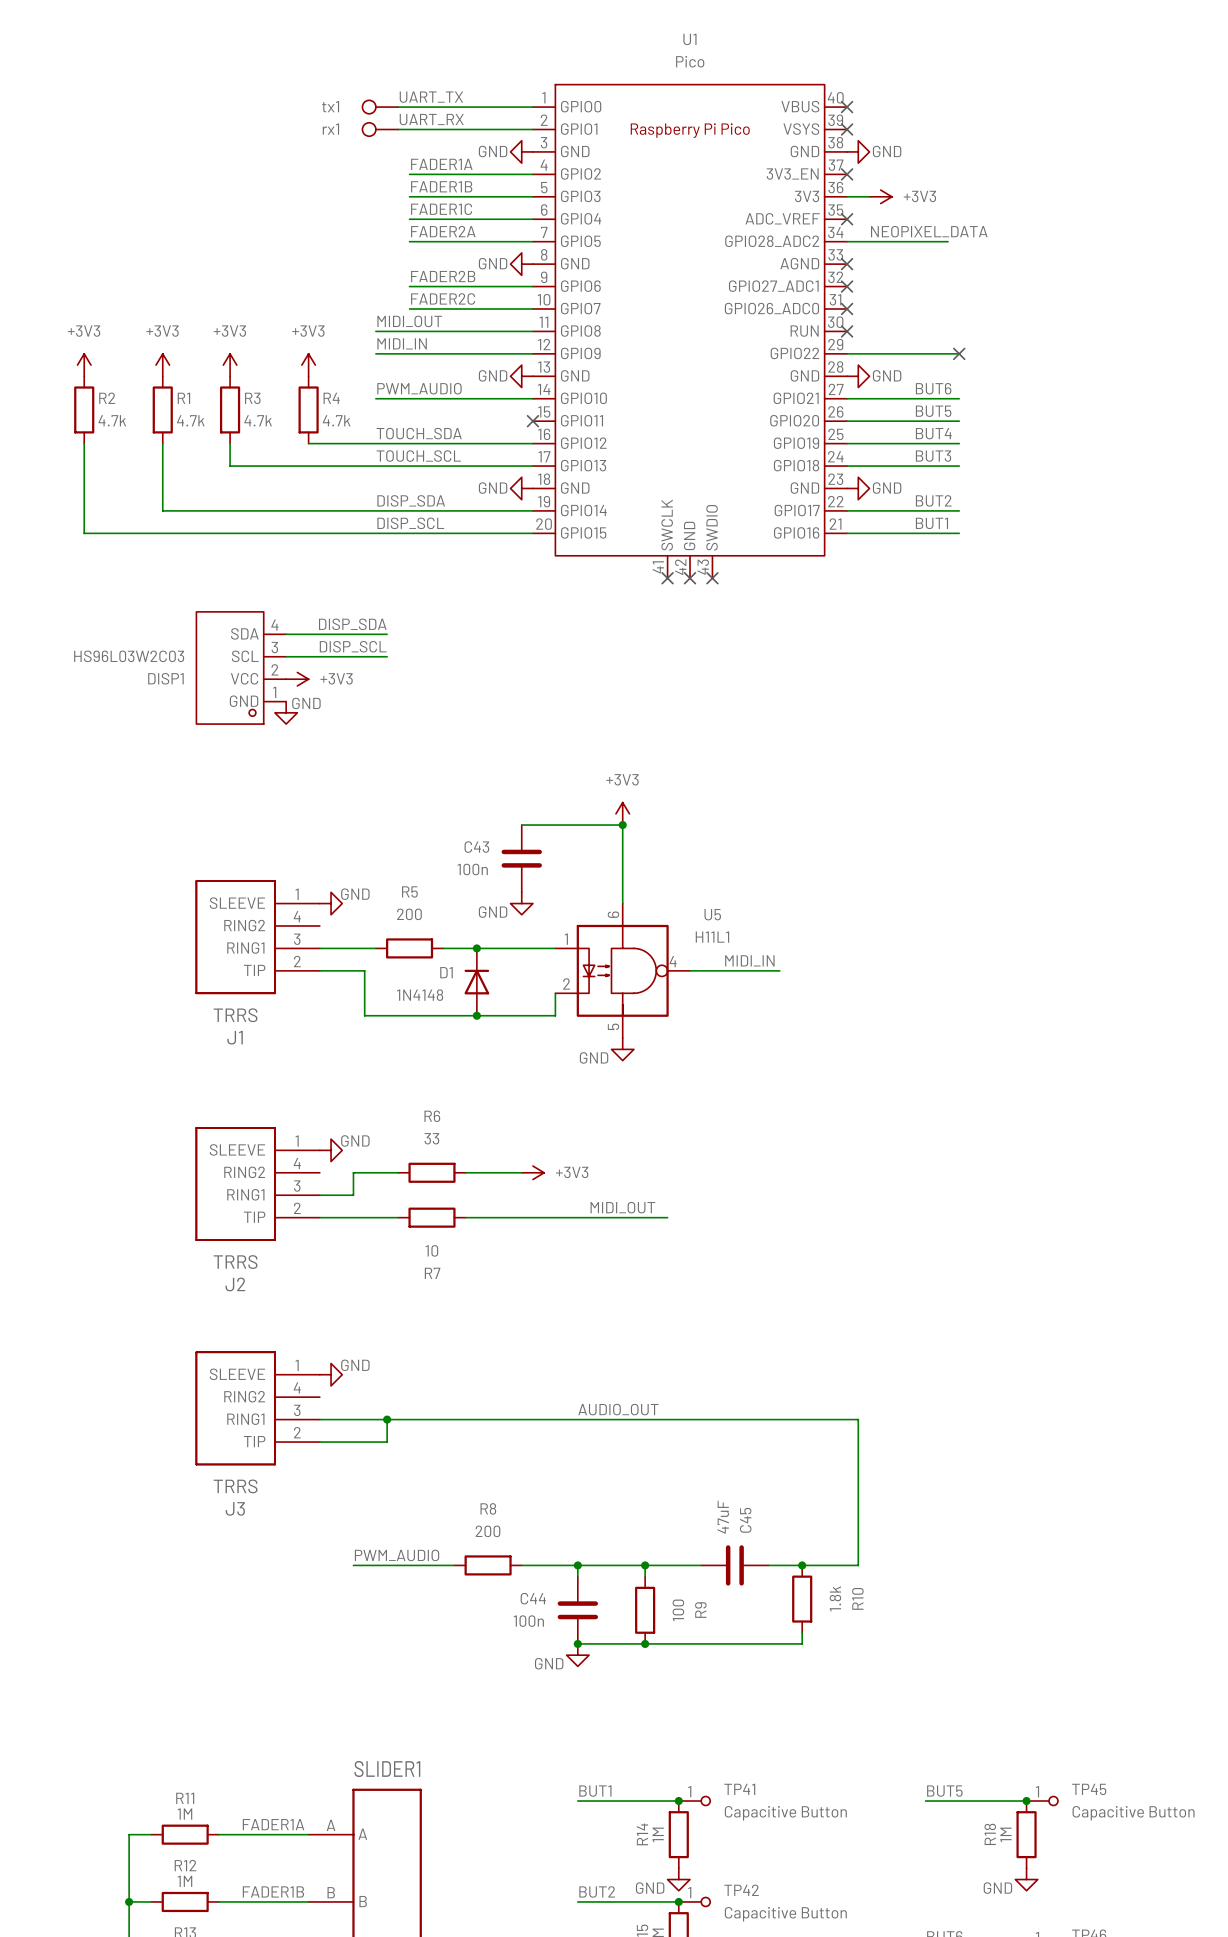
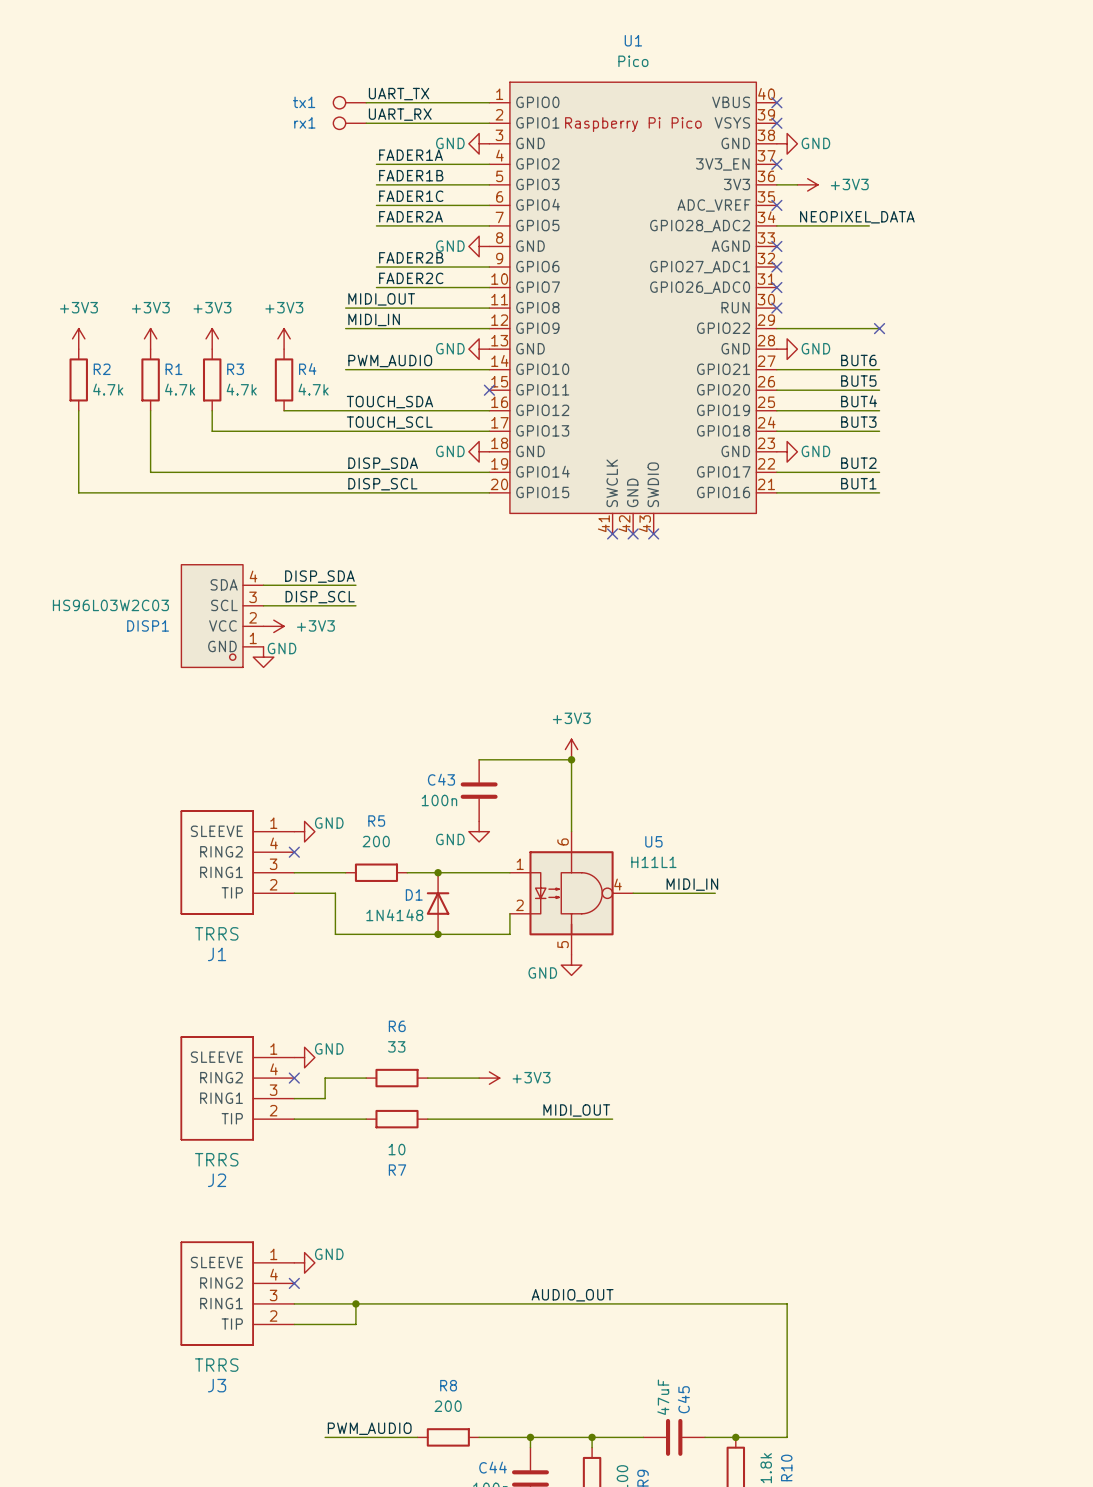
no-connect mark: none -> (294, 852)
no-connect mark: none -> (294, 1078)
no-connect mark: none -> (294, 1283)

